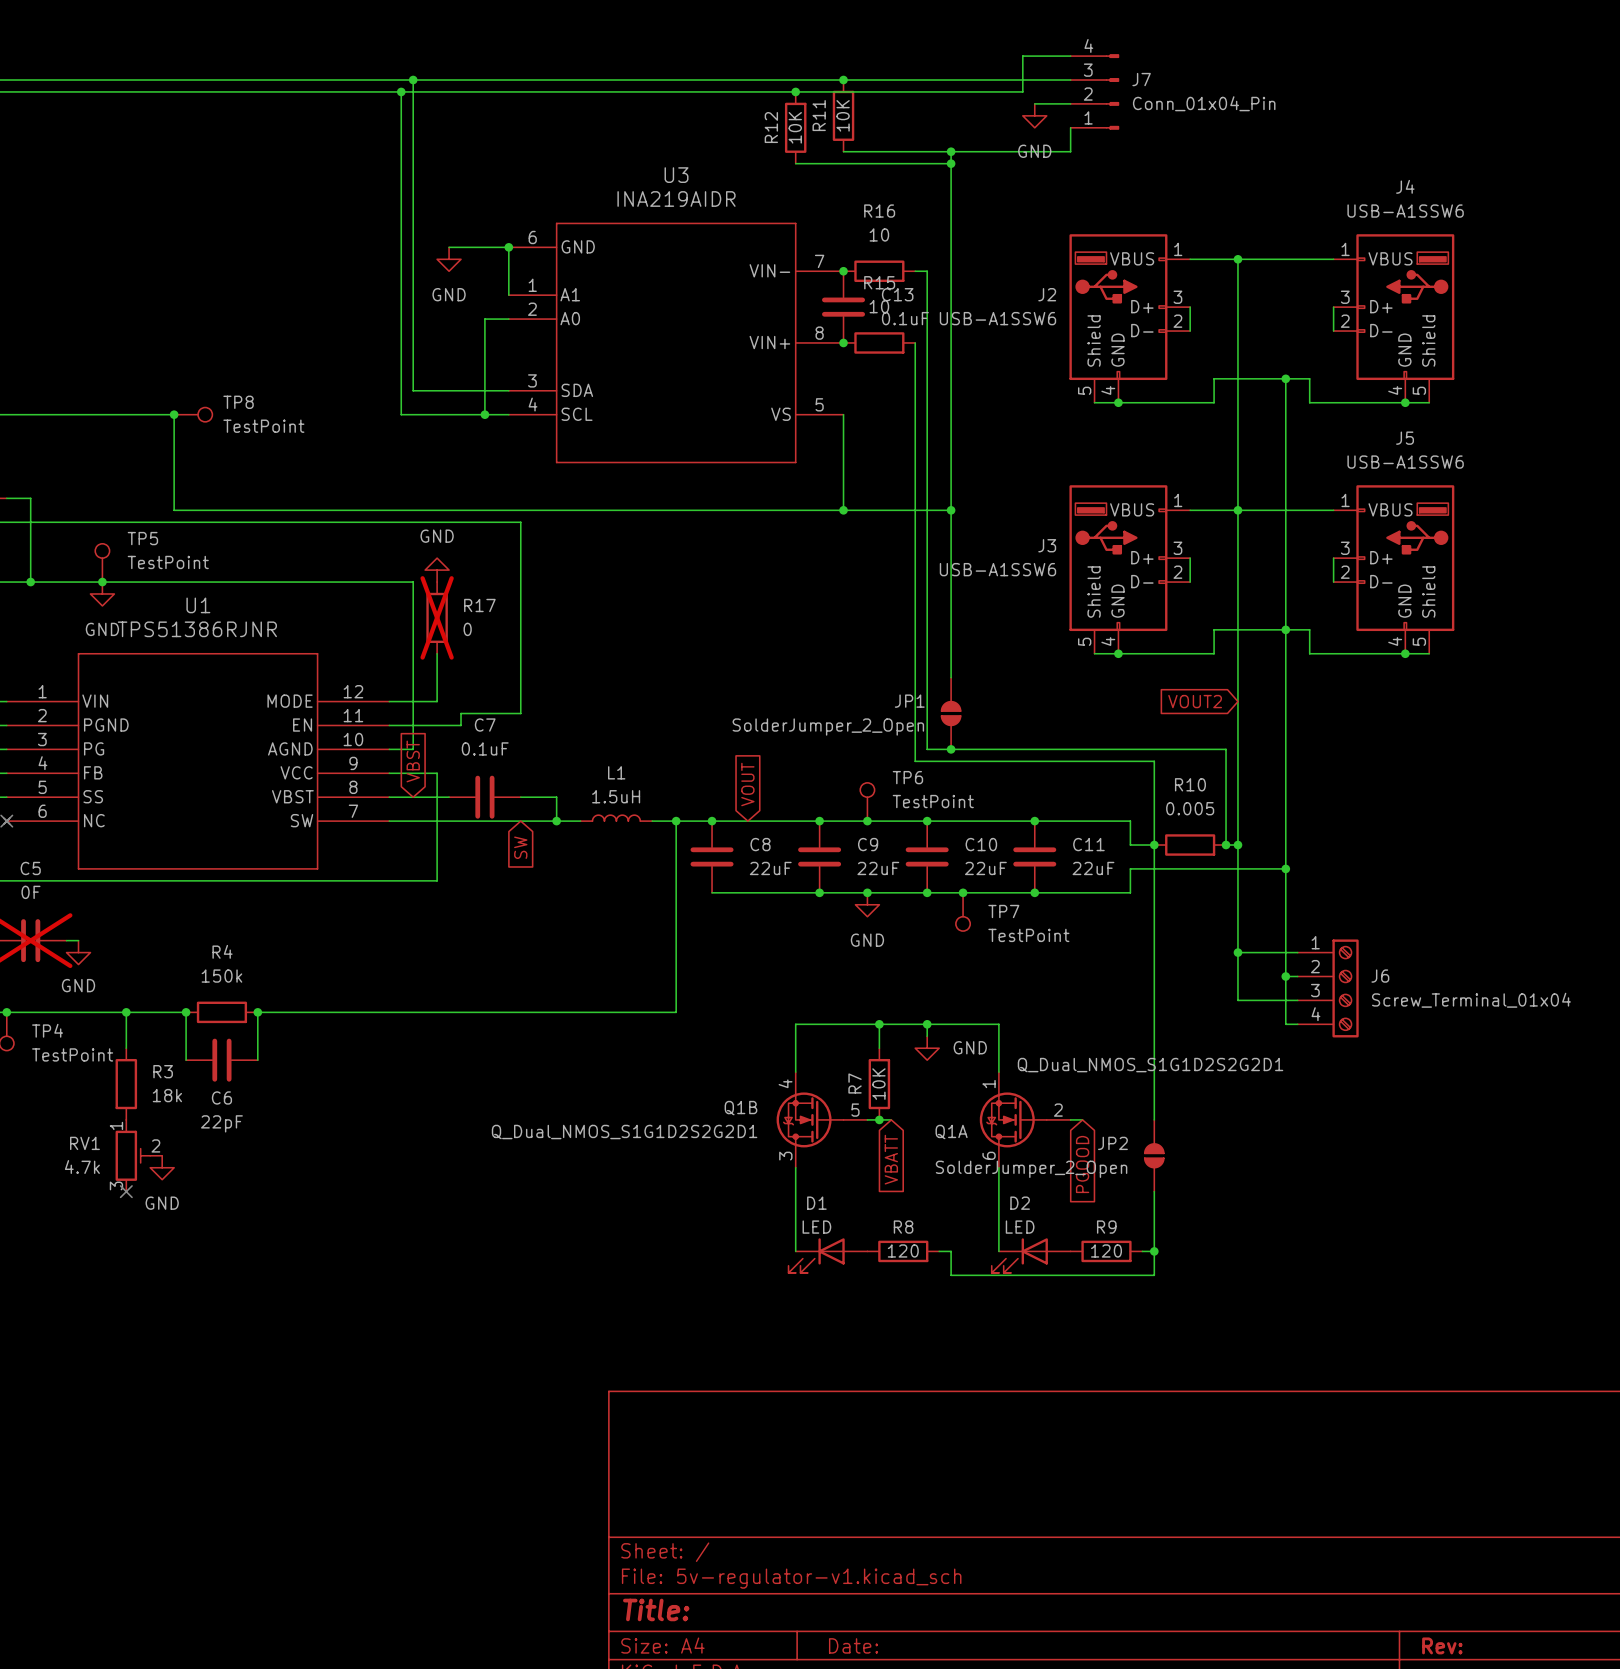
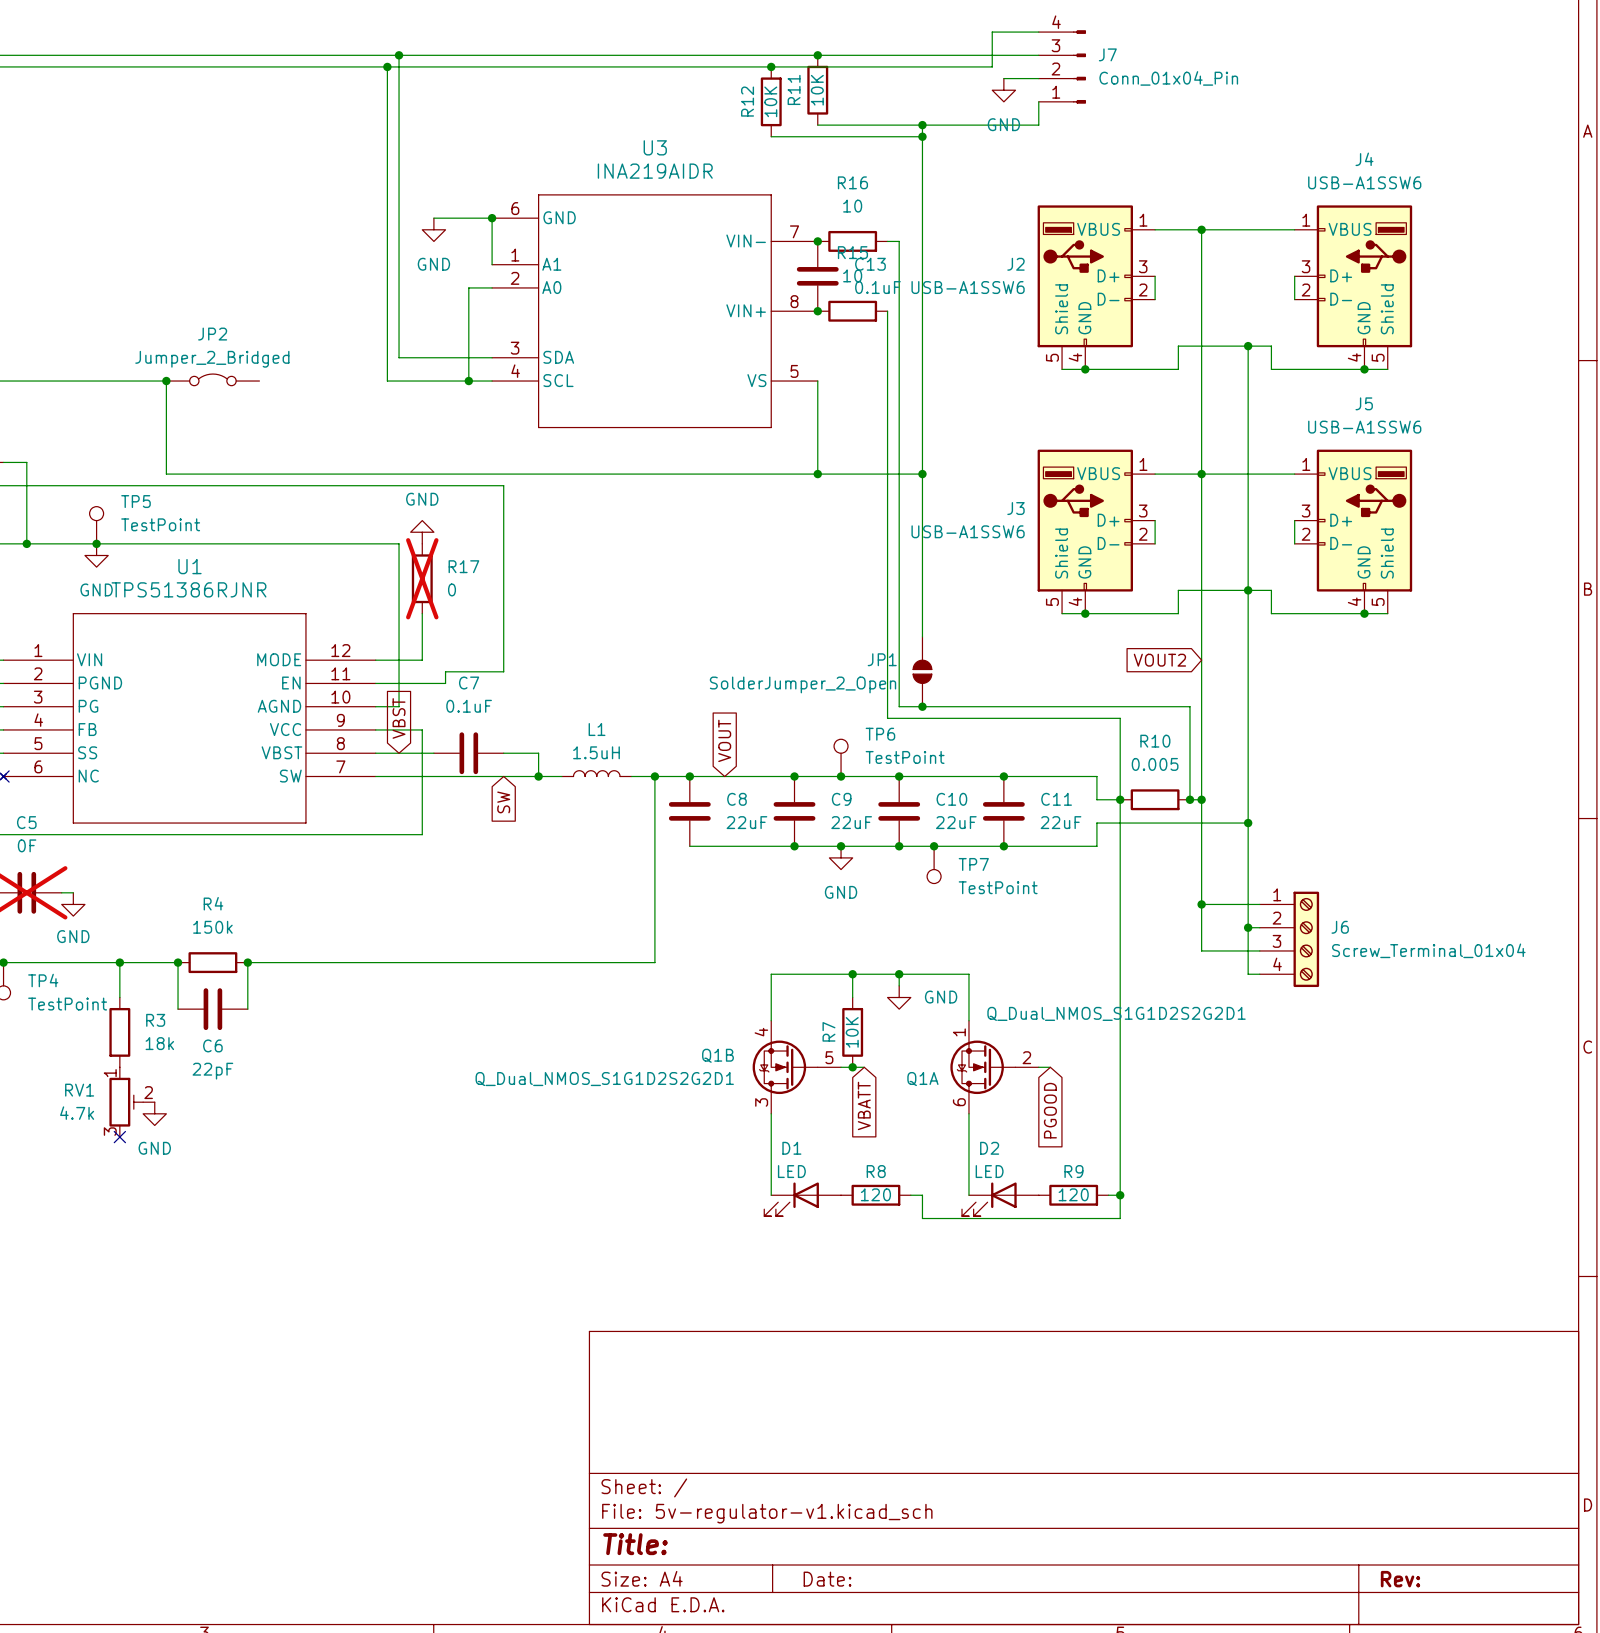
TP8: TestPoint (193, 414) -> none
JP2 symbol: [1144, 1119, 1164, 1192] -> [166, 374, 260, 386]
JP2 name position: JP2 (1112, 1143) -> JP2 (212, 334)
JP2 value: SolderJumper_2_Open (1031, 1169) -> Jumper_2_Bridged (212, 359)

